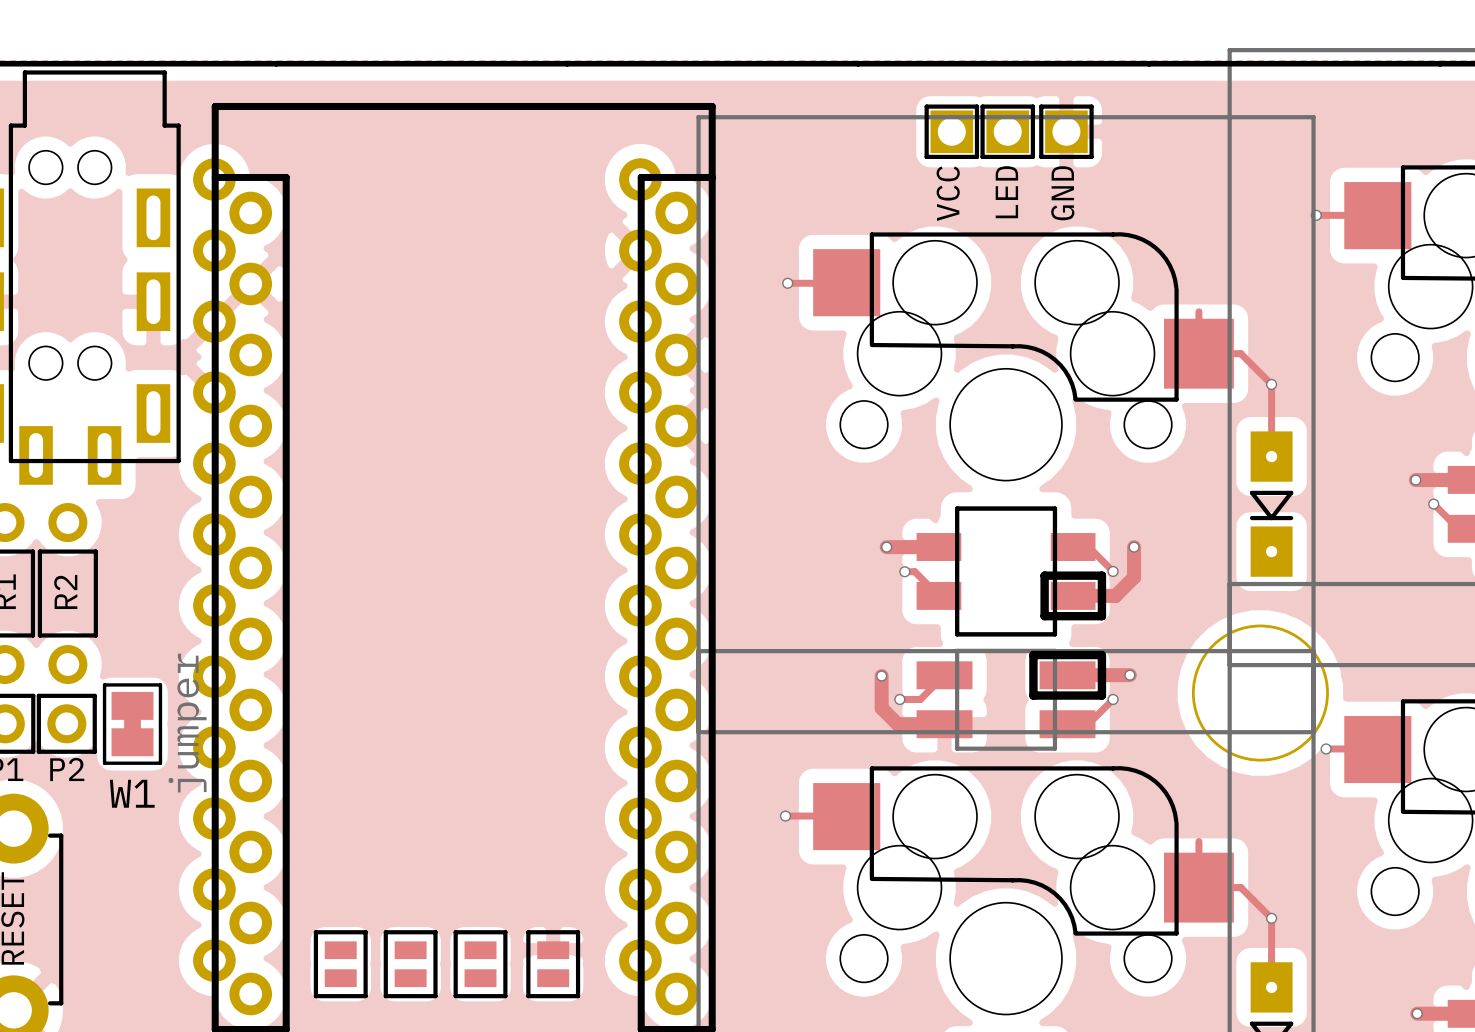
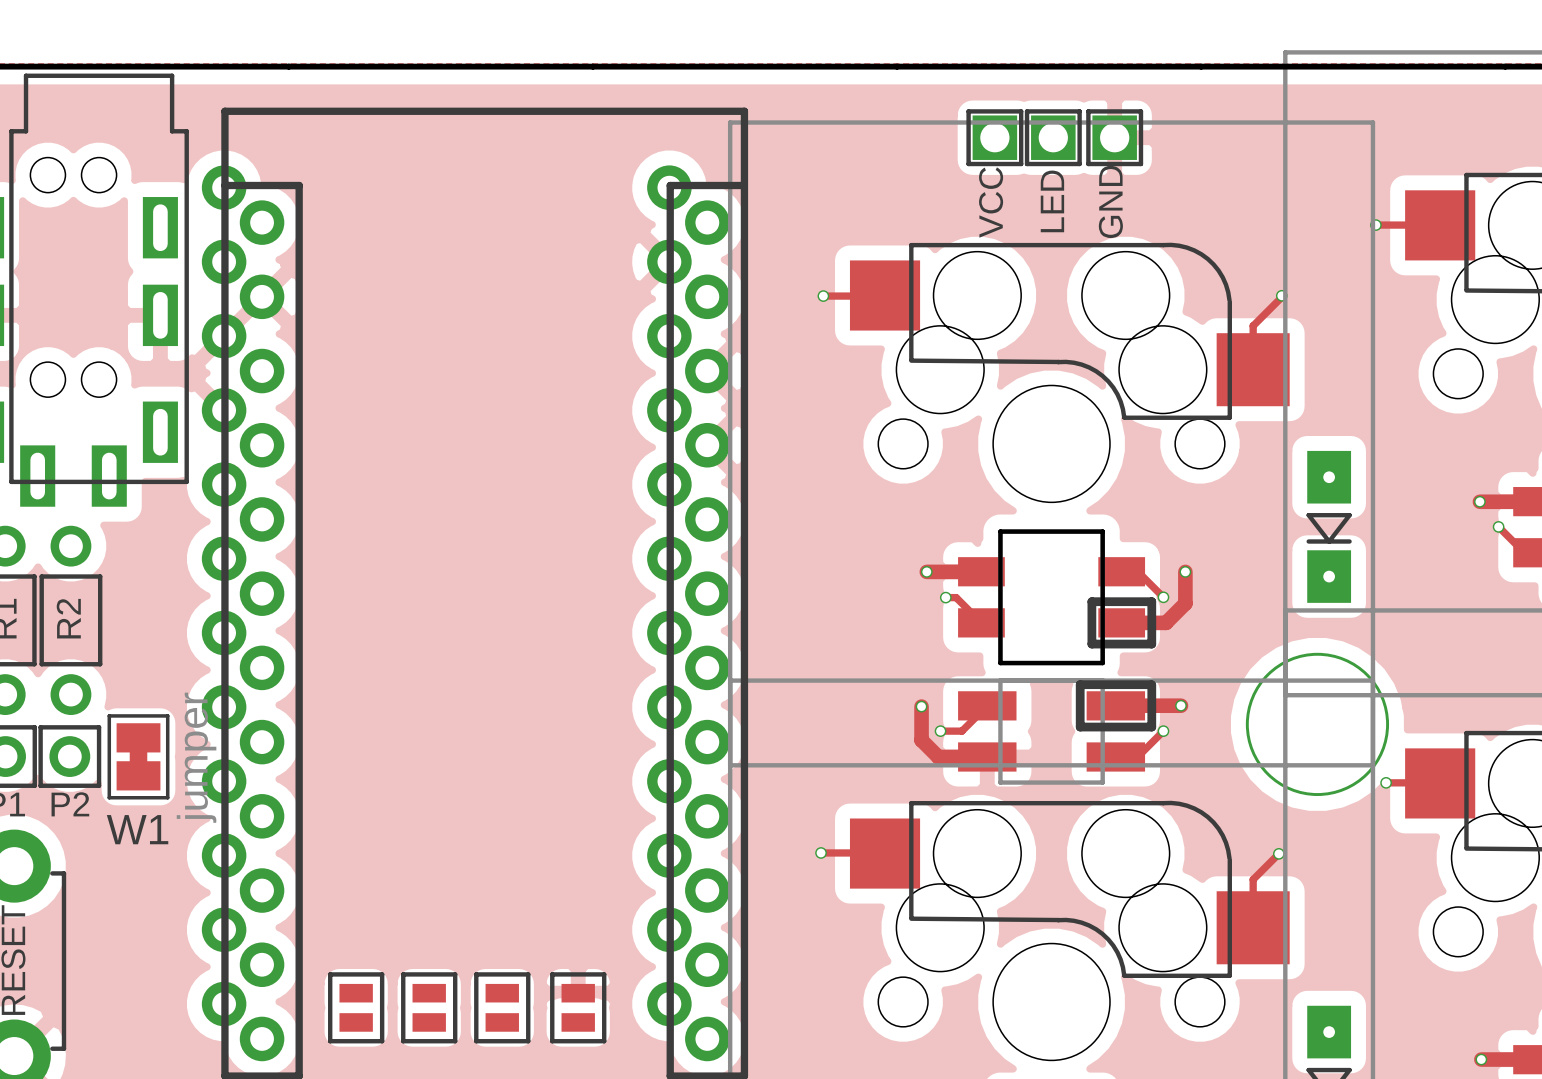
track: none -> (1281, 295) (1253, 325)
track: (1198, 353) (1240, 353) (1271, 384) (1271, 456) -> none
via position: (1271, 384) -> (1281, 295)
track: none -> (1278, 853) (1253, 879)
track: (1198, 887) (1240, 887) (1271, 918) (1271, 987) -> none
via position: (1271, 918) -> (1278, 853)

